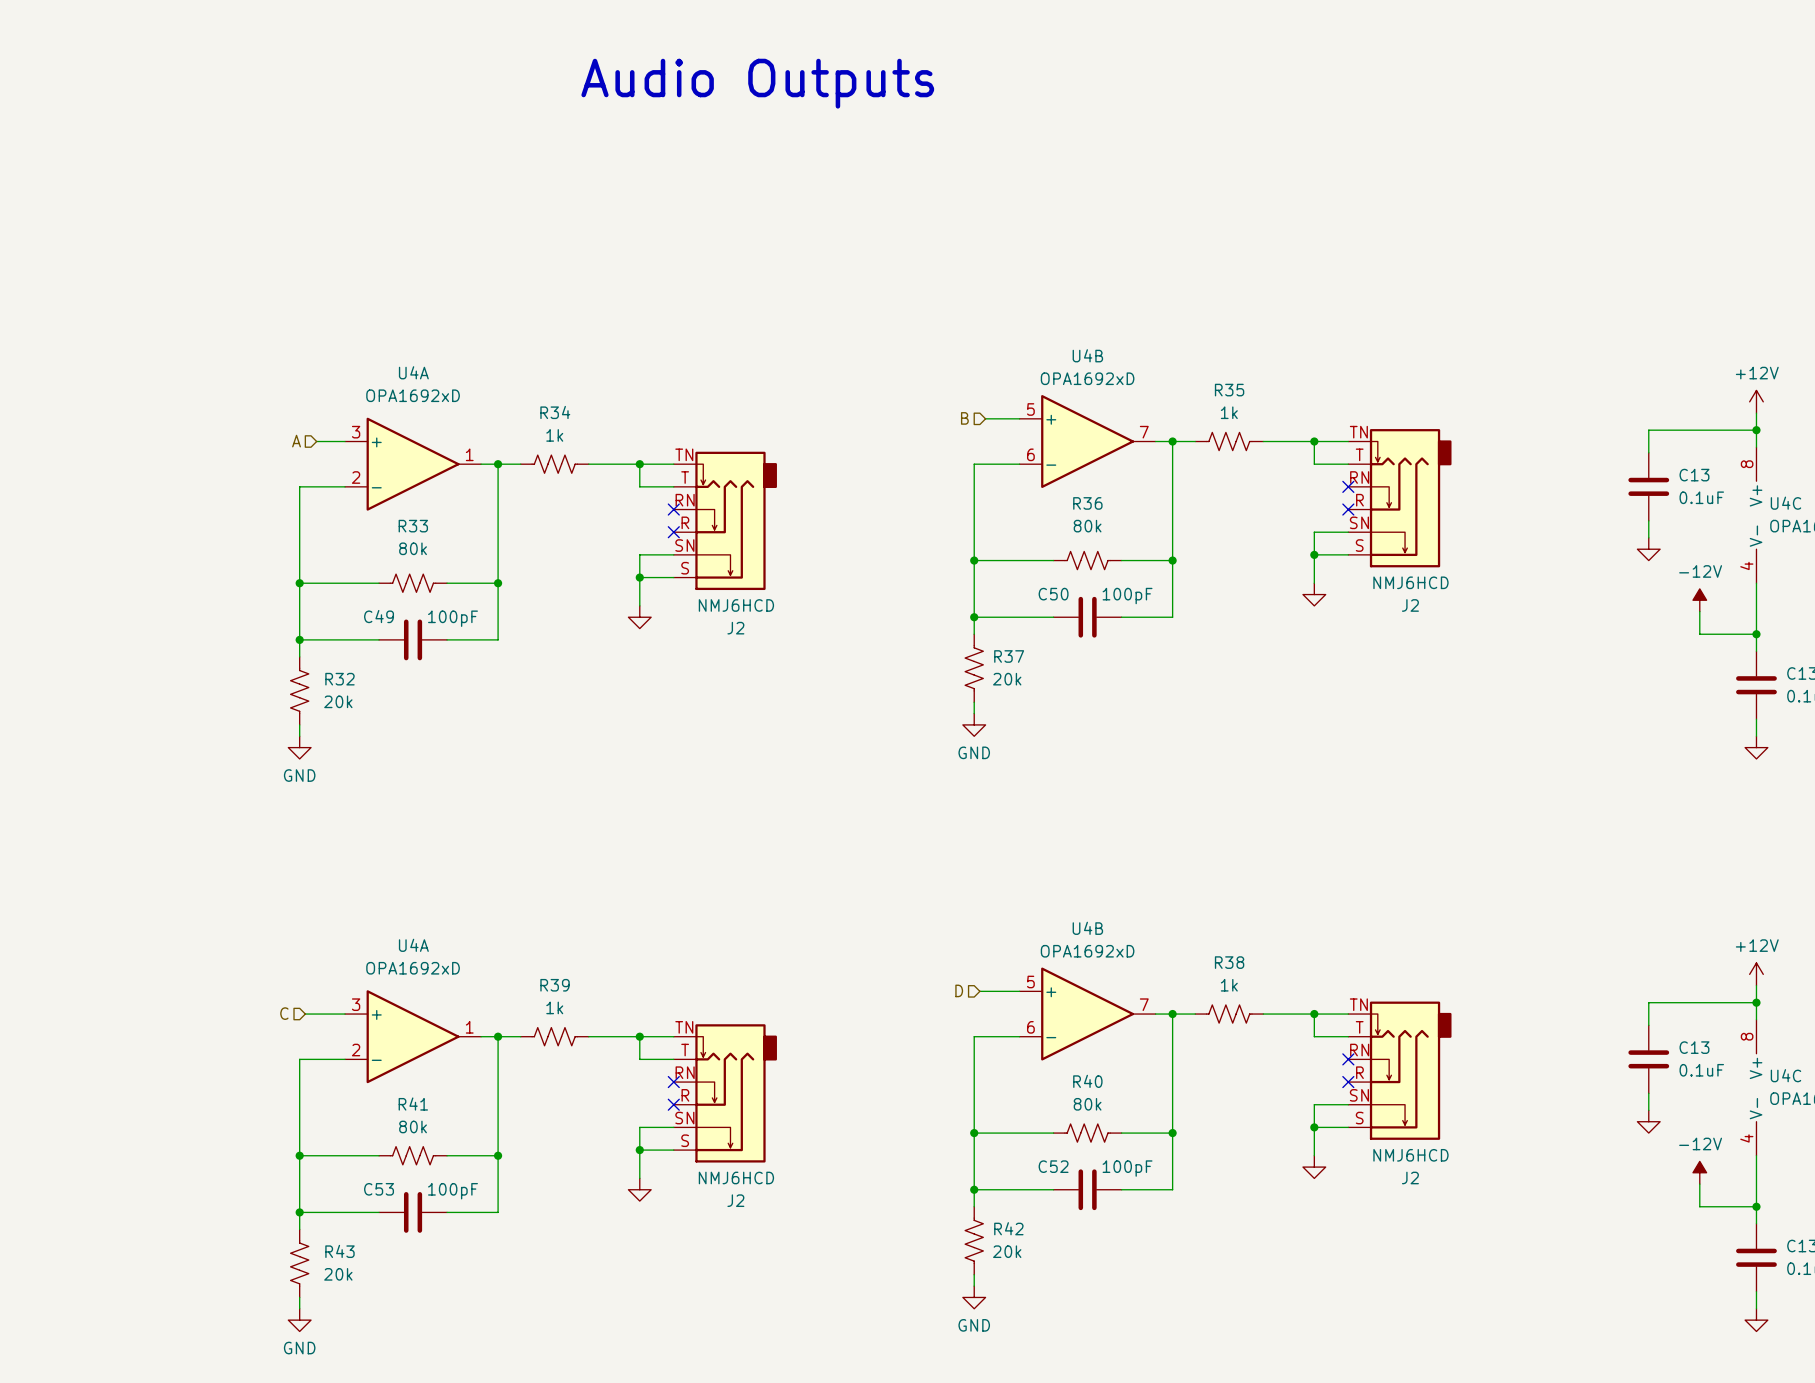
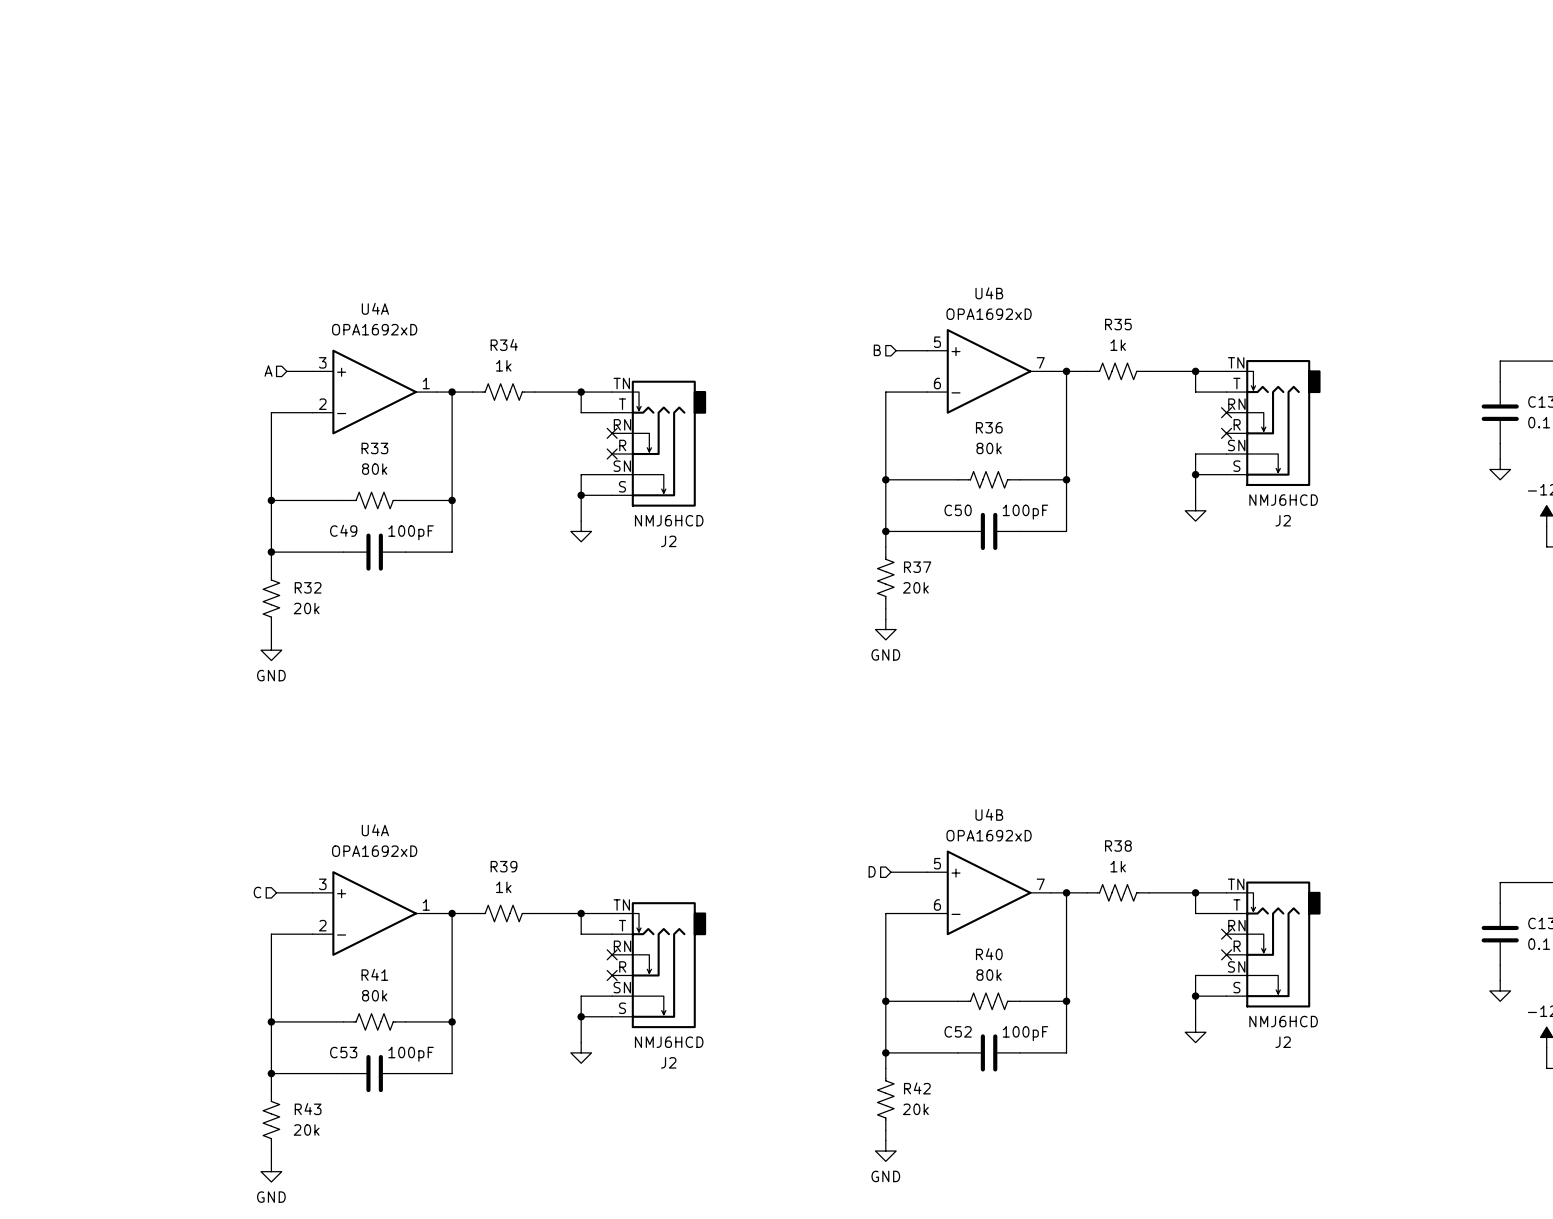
text: Audio Outputs (757, 83) -> none

